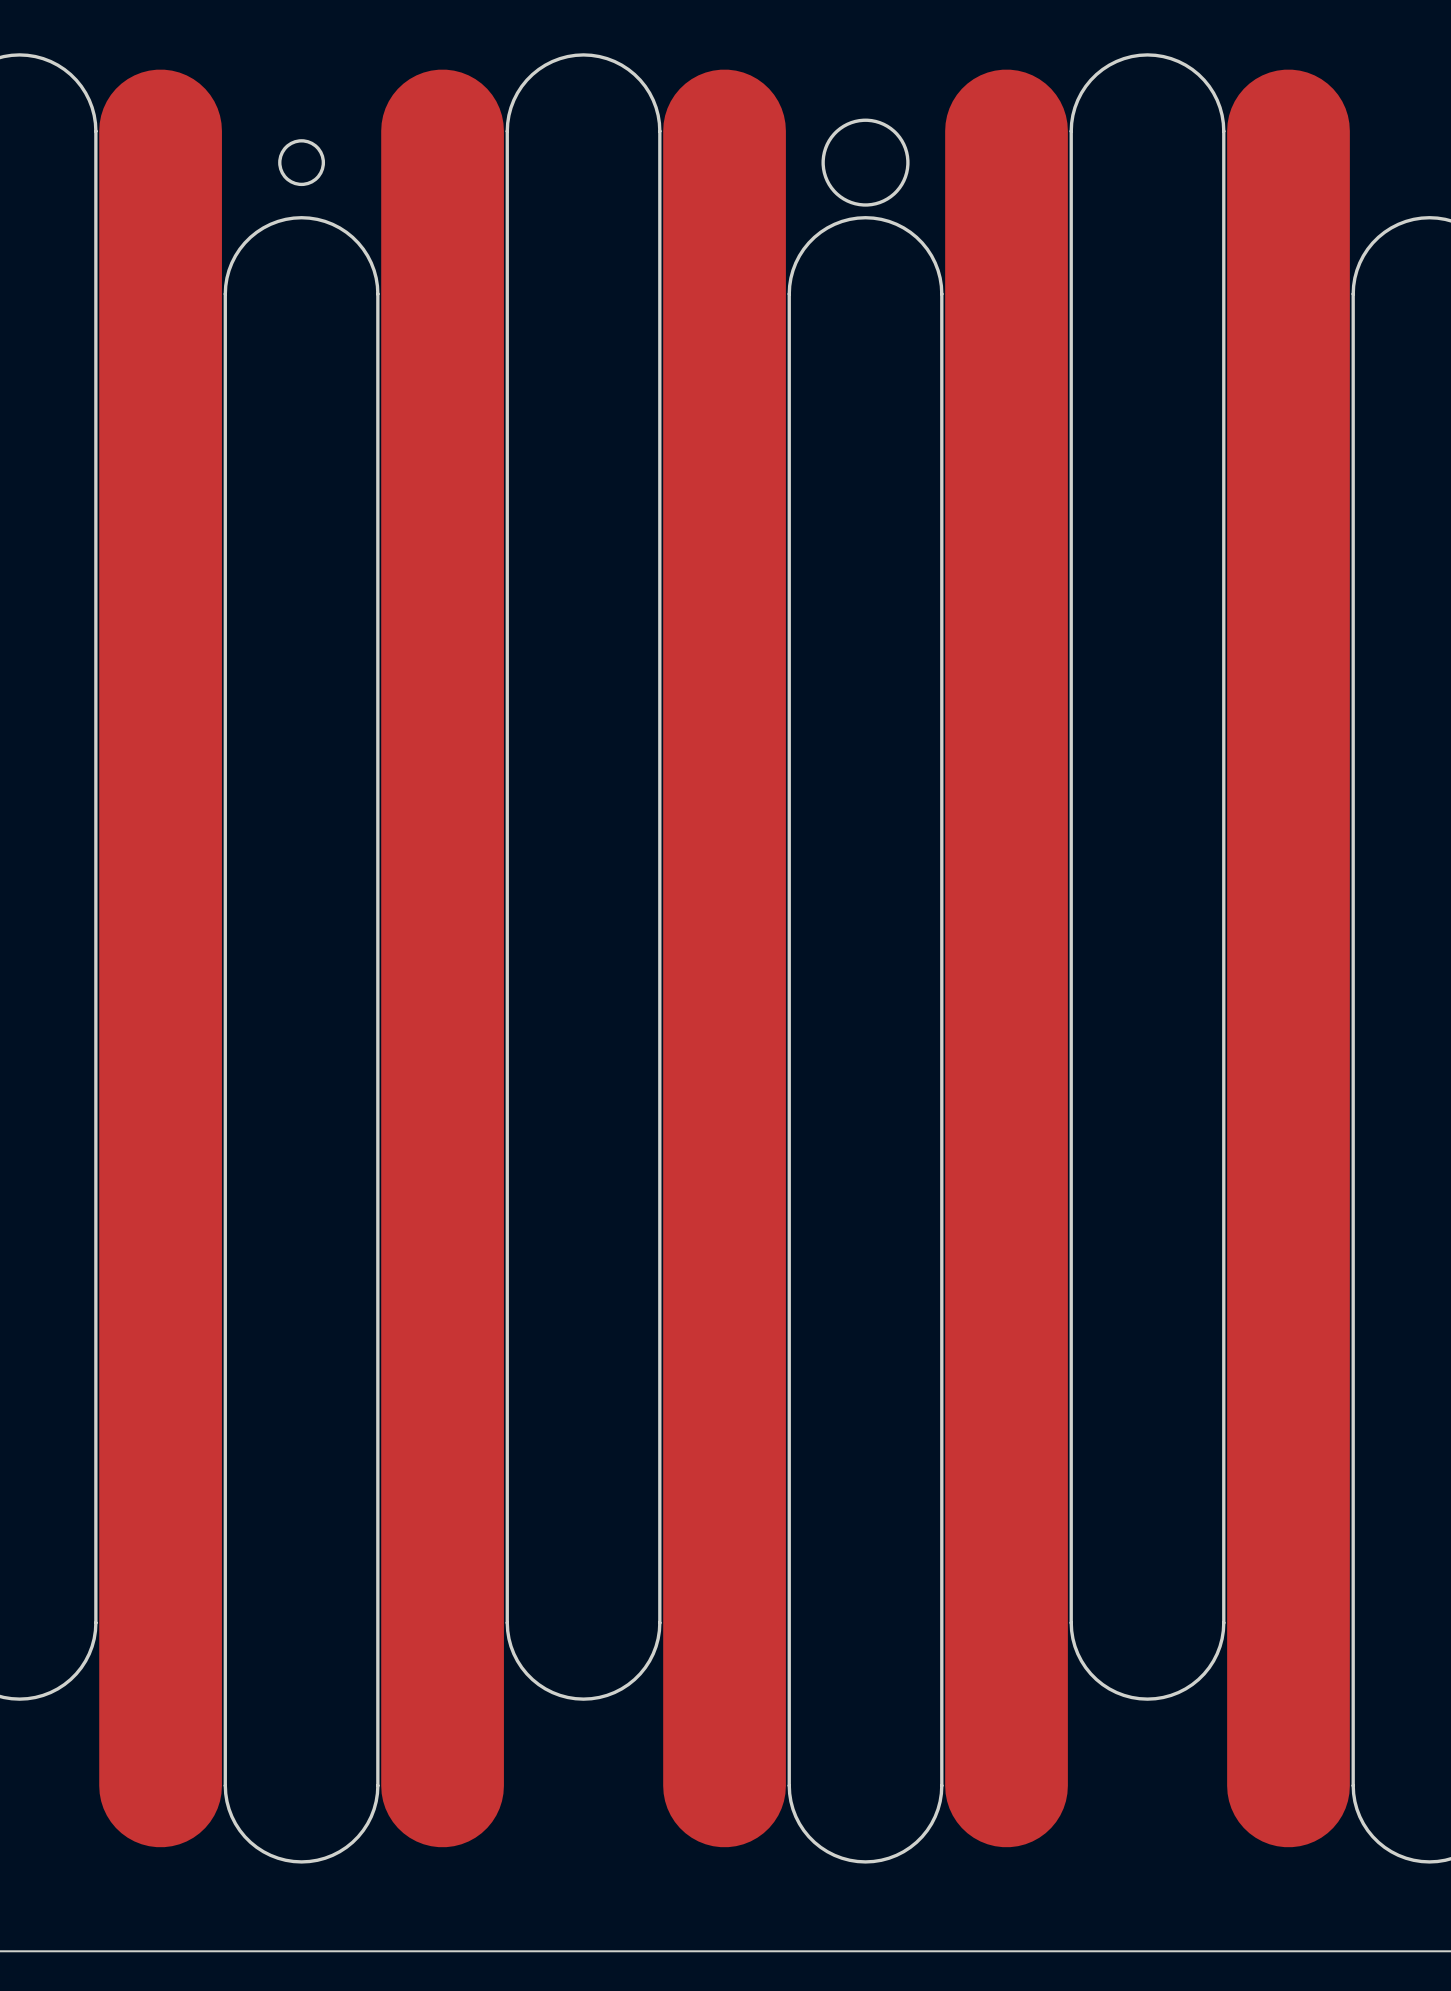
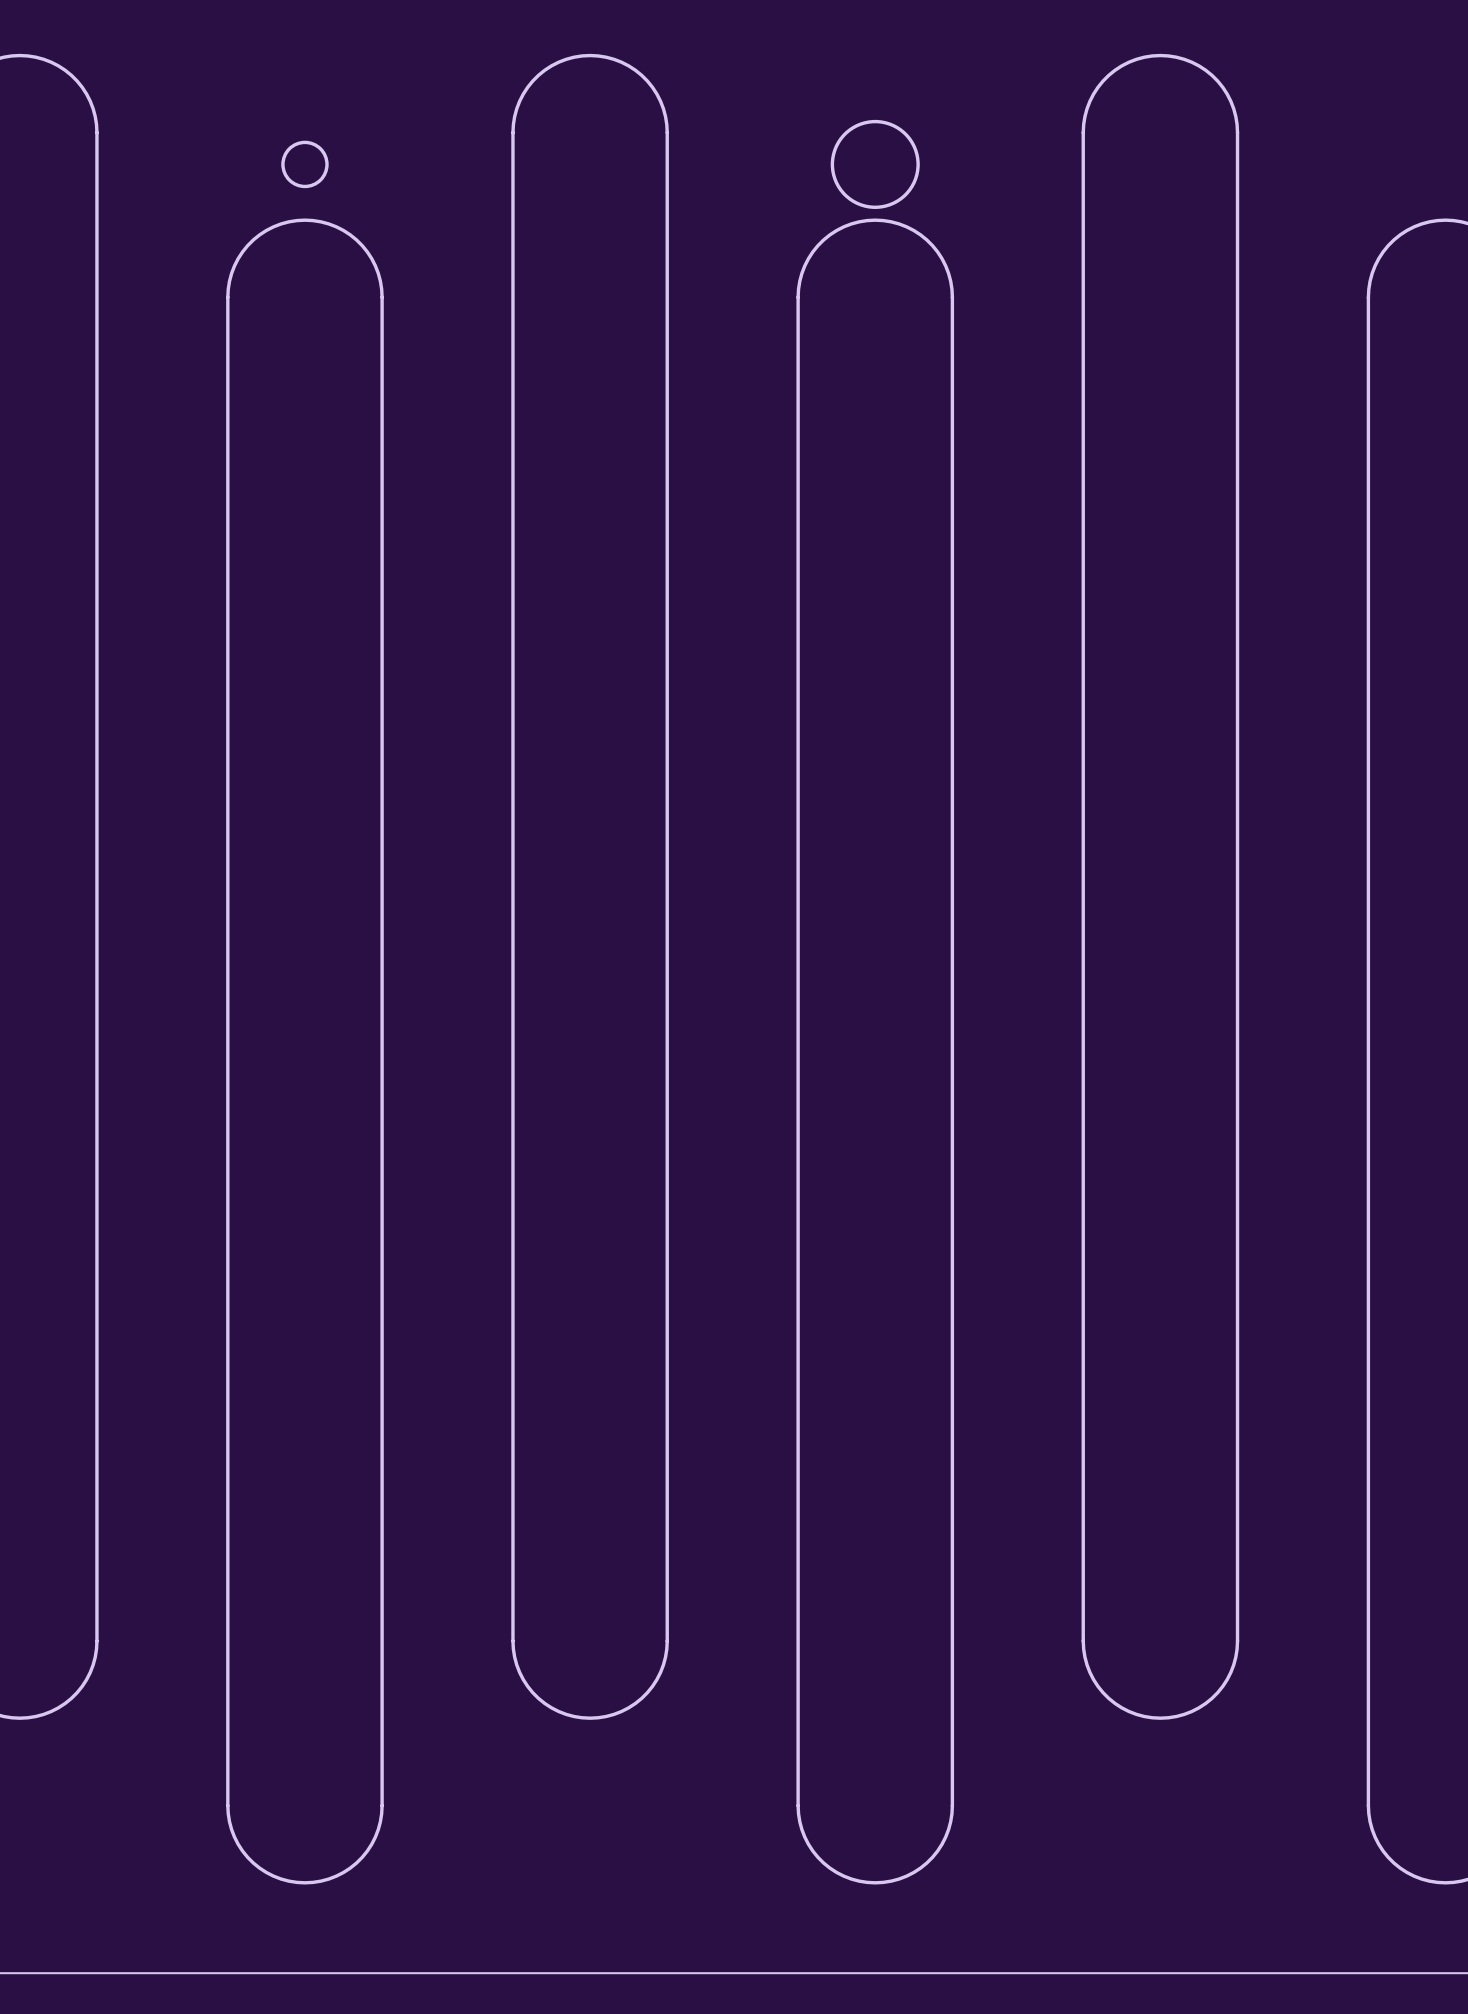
part: (160, 958) -> none
part: (442, 958) -> none
part: (724, 958) -> none
part: (1006, 958) -> none
part: (1288, 958) -> none

